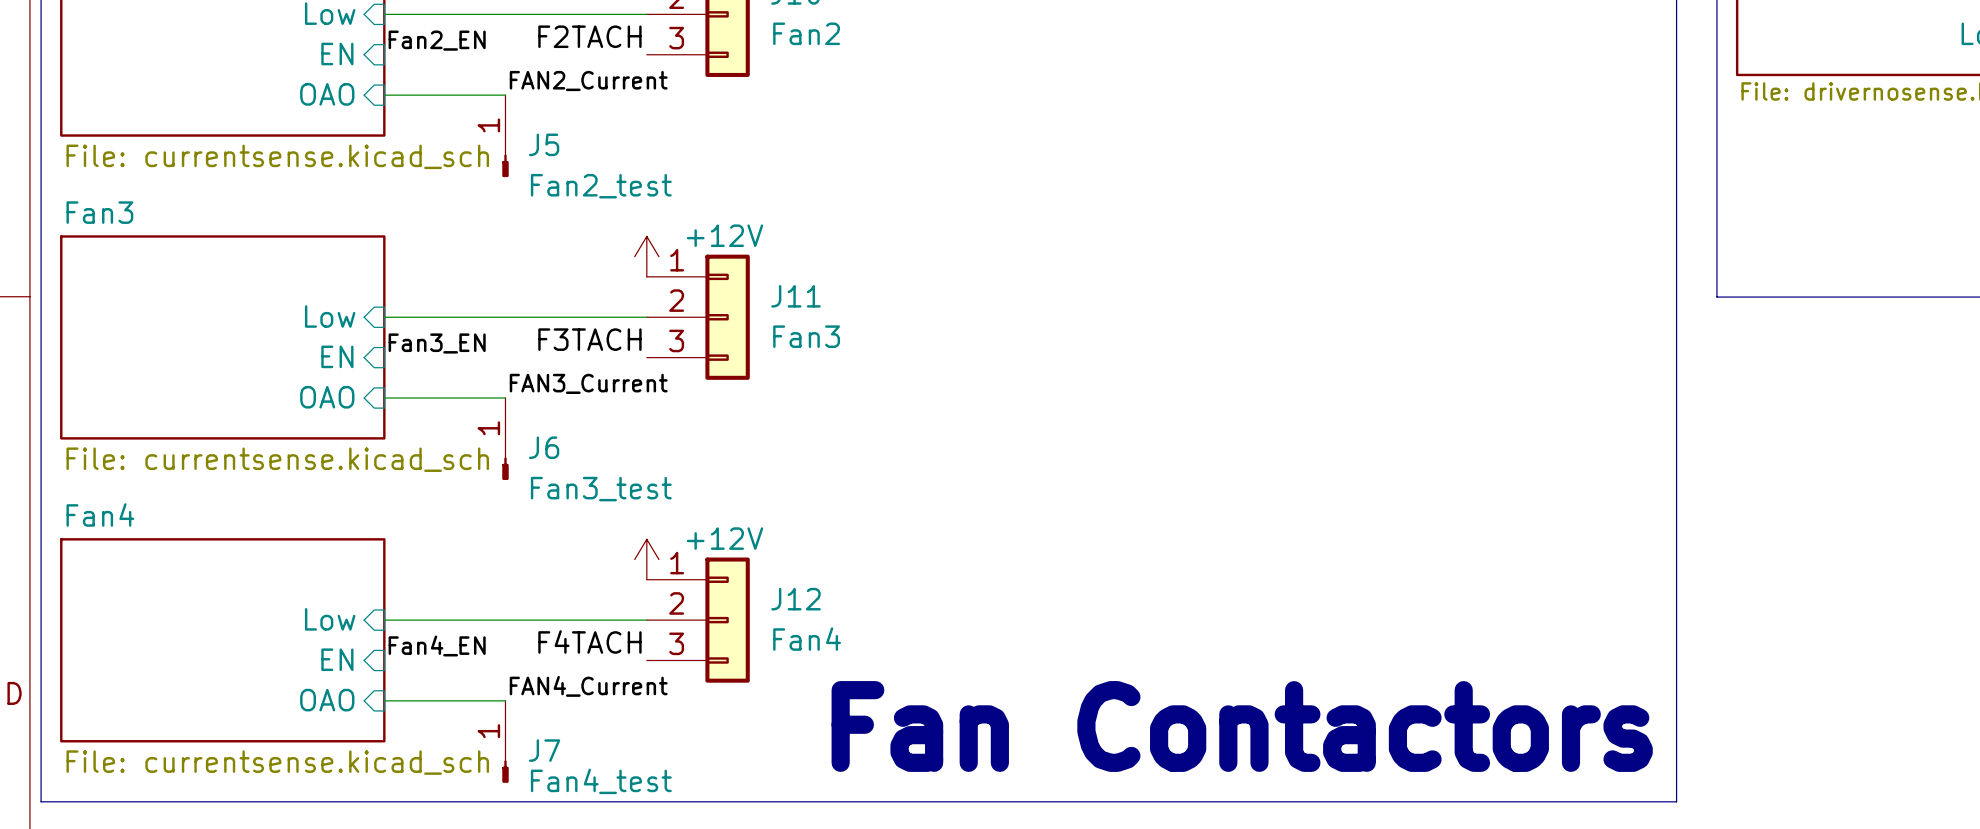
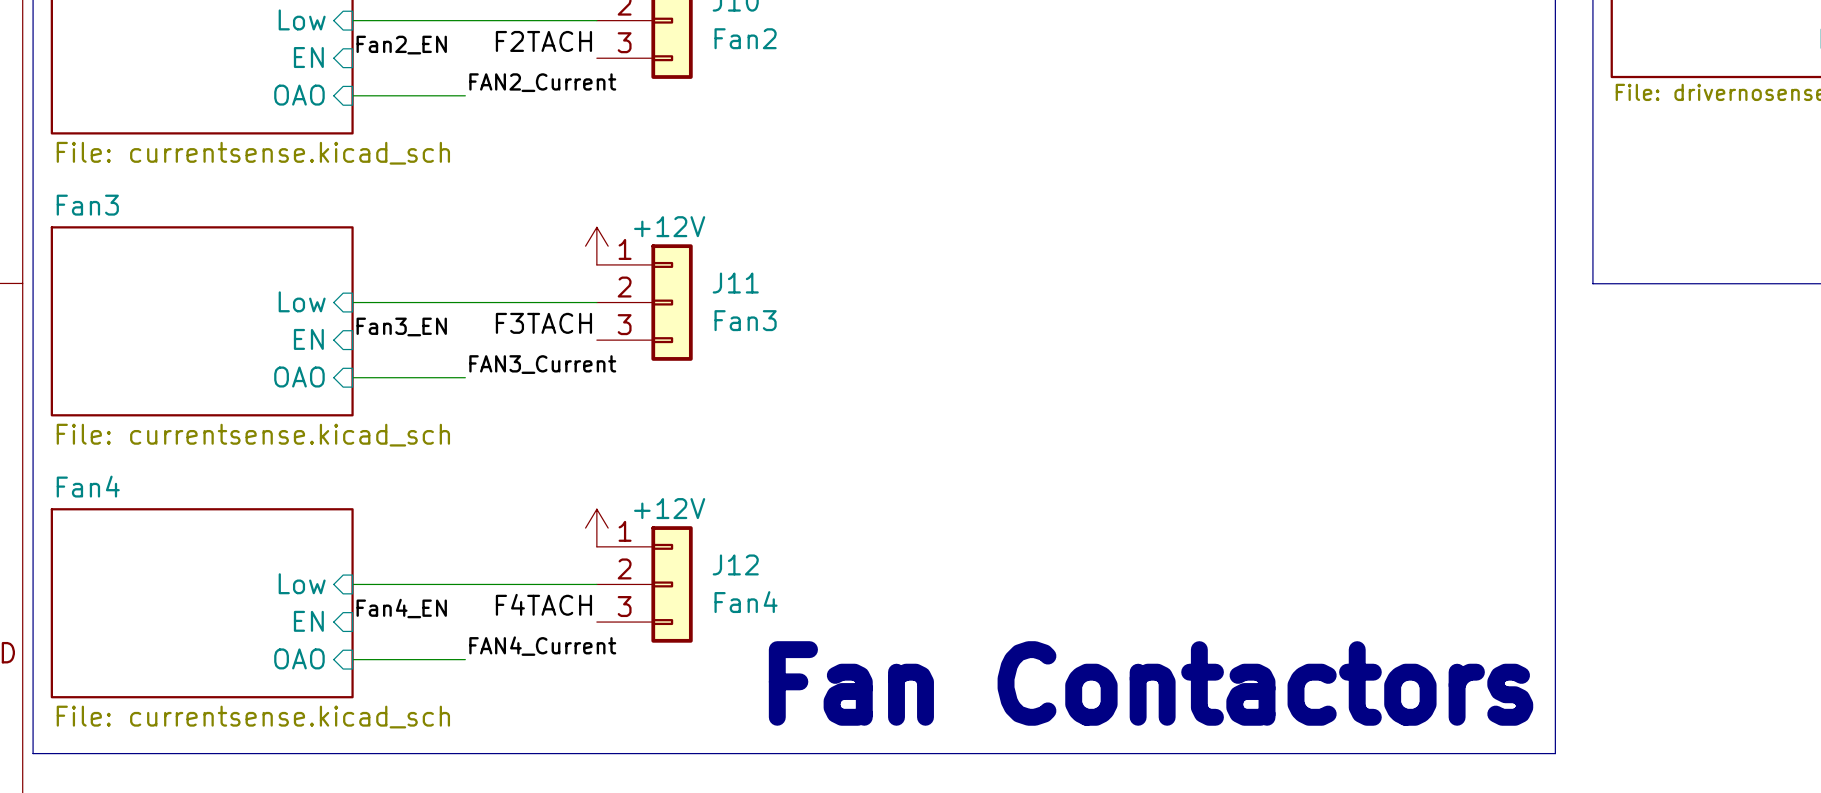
J5: Fan2_test (505, 136) -> none
J6: Fan3_test (505, 438) -> none
J7: Fan4_test (505, 741) -> none

